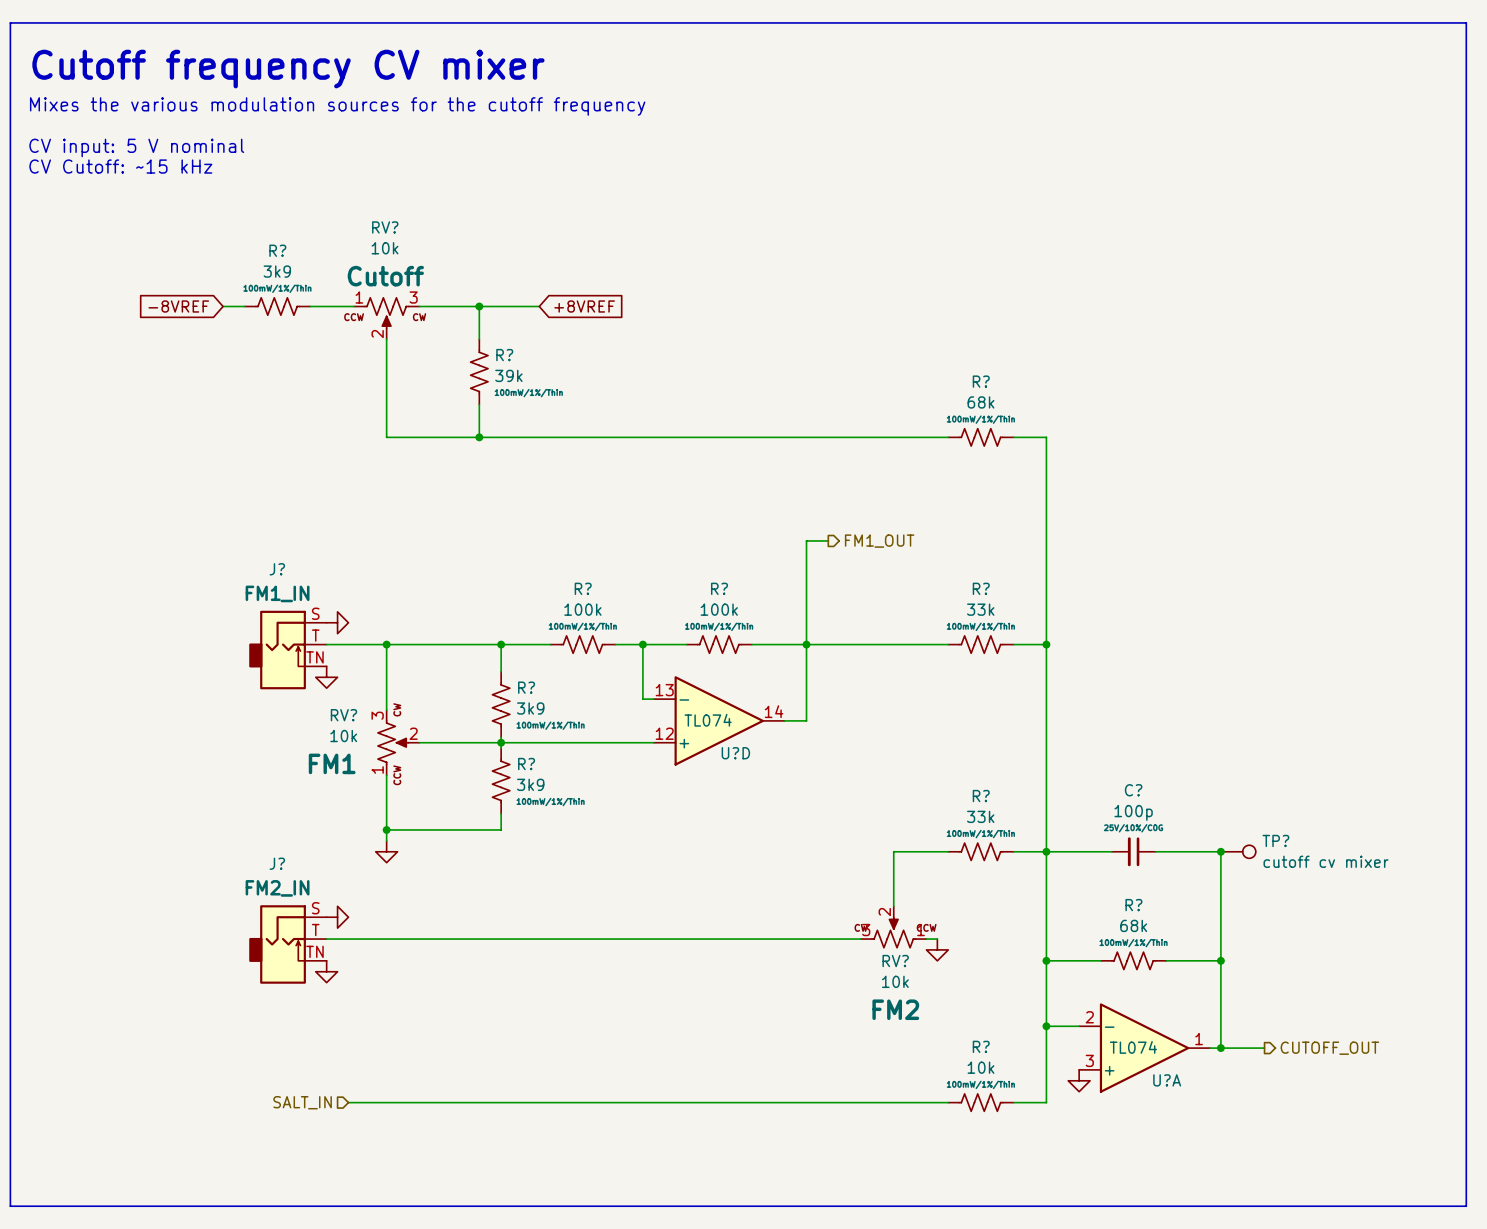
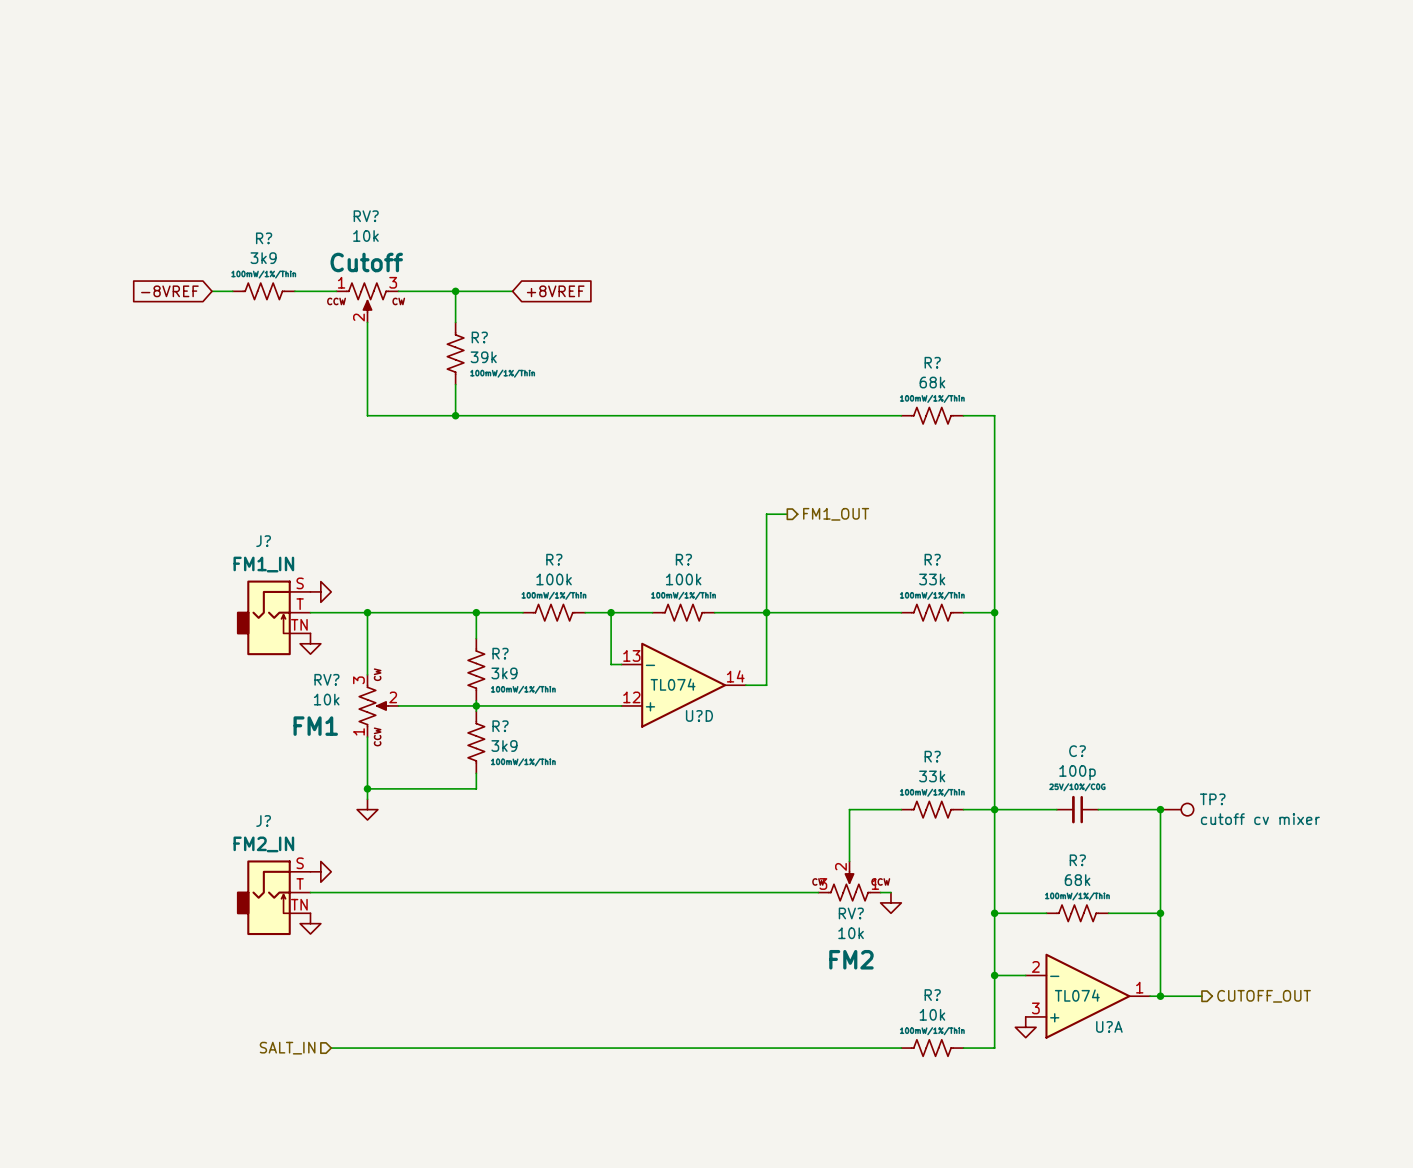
line: (10, 22) (1466, 22) (1466, 1206) (10, 1206) (10, 22) -> none
text: Cutoff frequency CV mixer (288, 69) -> none
text: Mixes the various modulation sources for the cutoff frequency (337, 106) -> none
text: CV input: 5 V nominal (136, 147) -> none
text: CV Cutoff: ~15 kHz (120, 166) -> none

